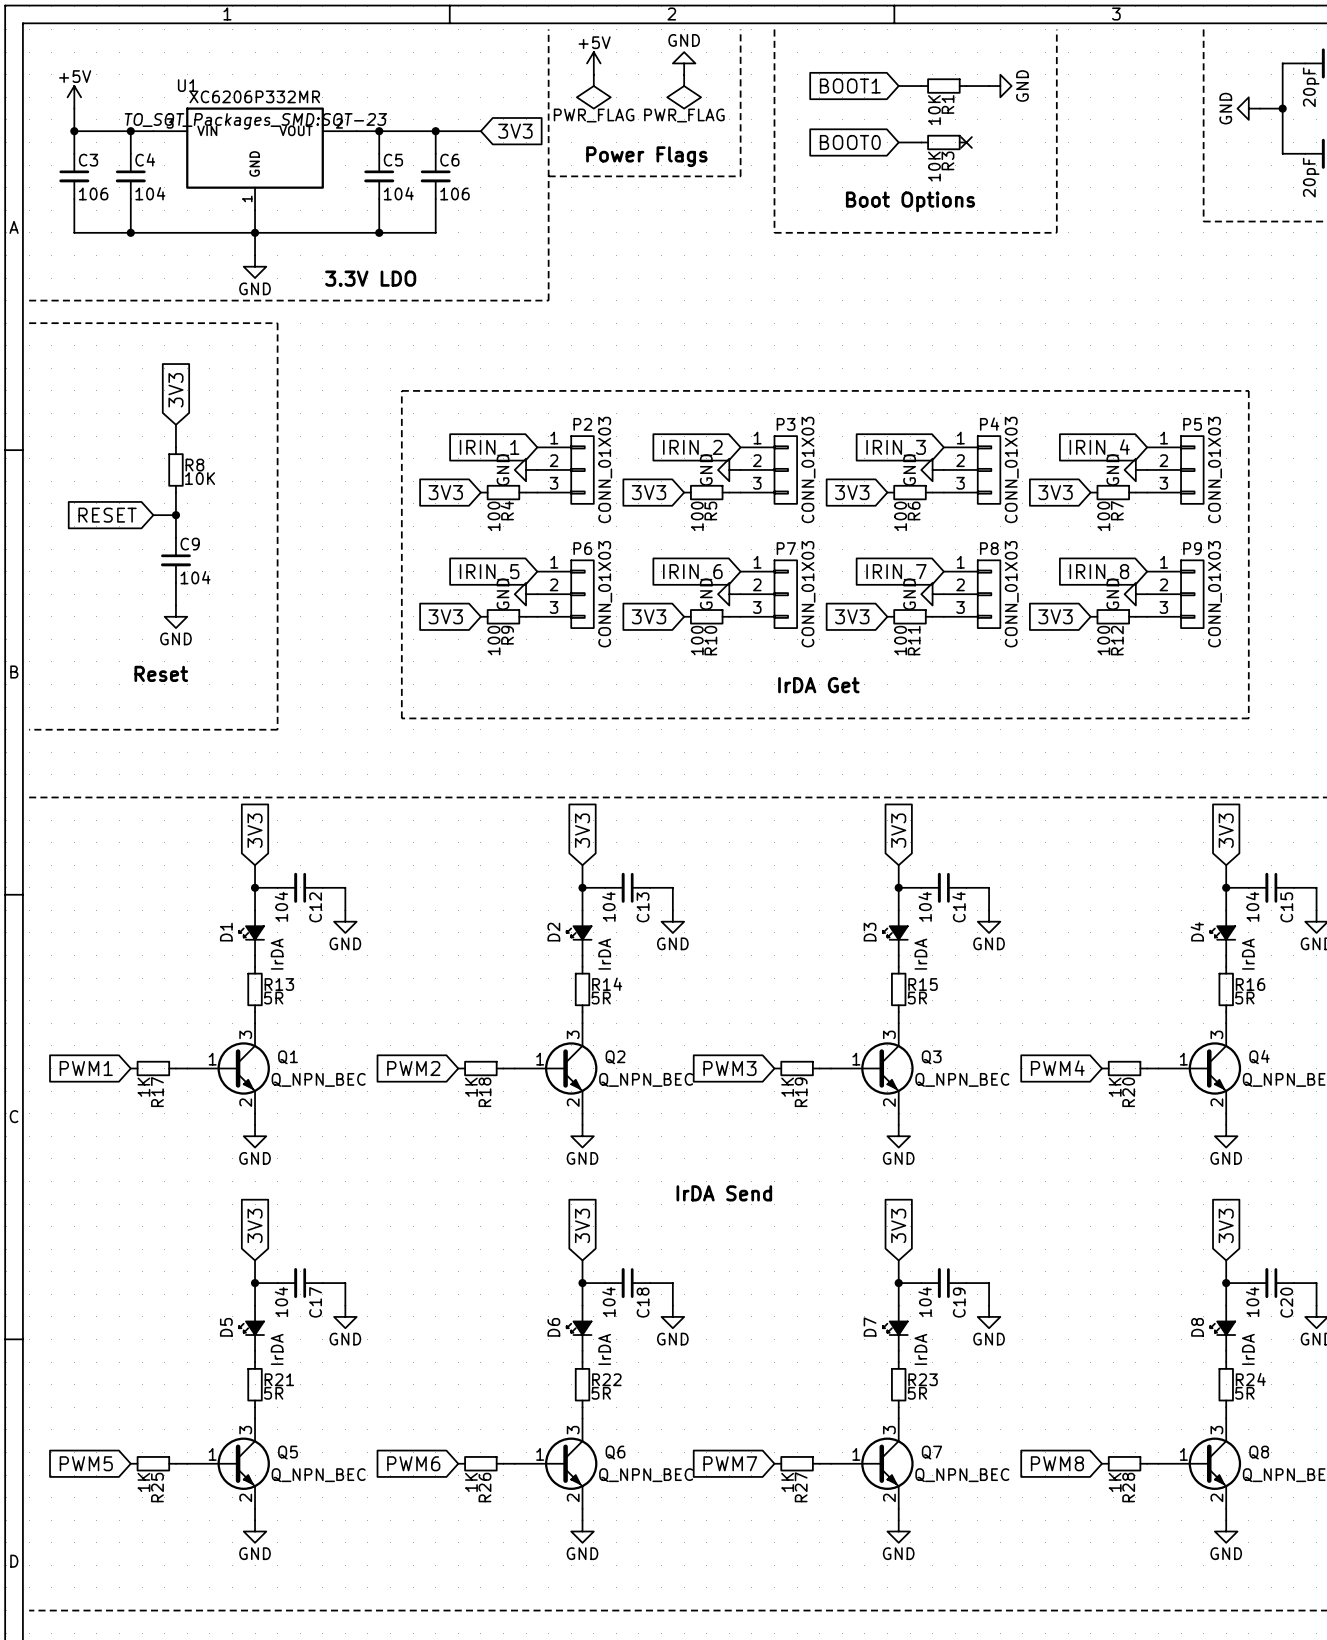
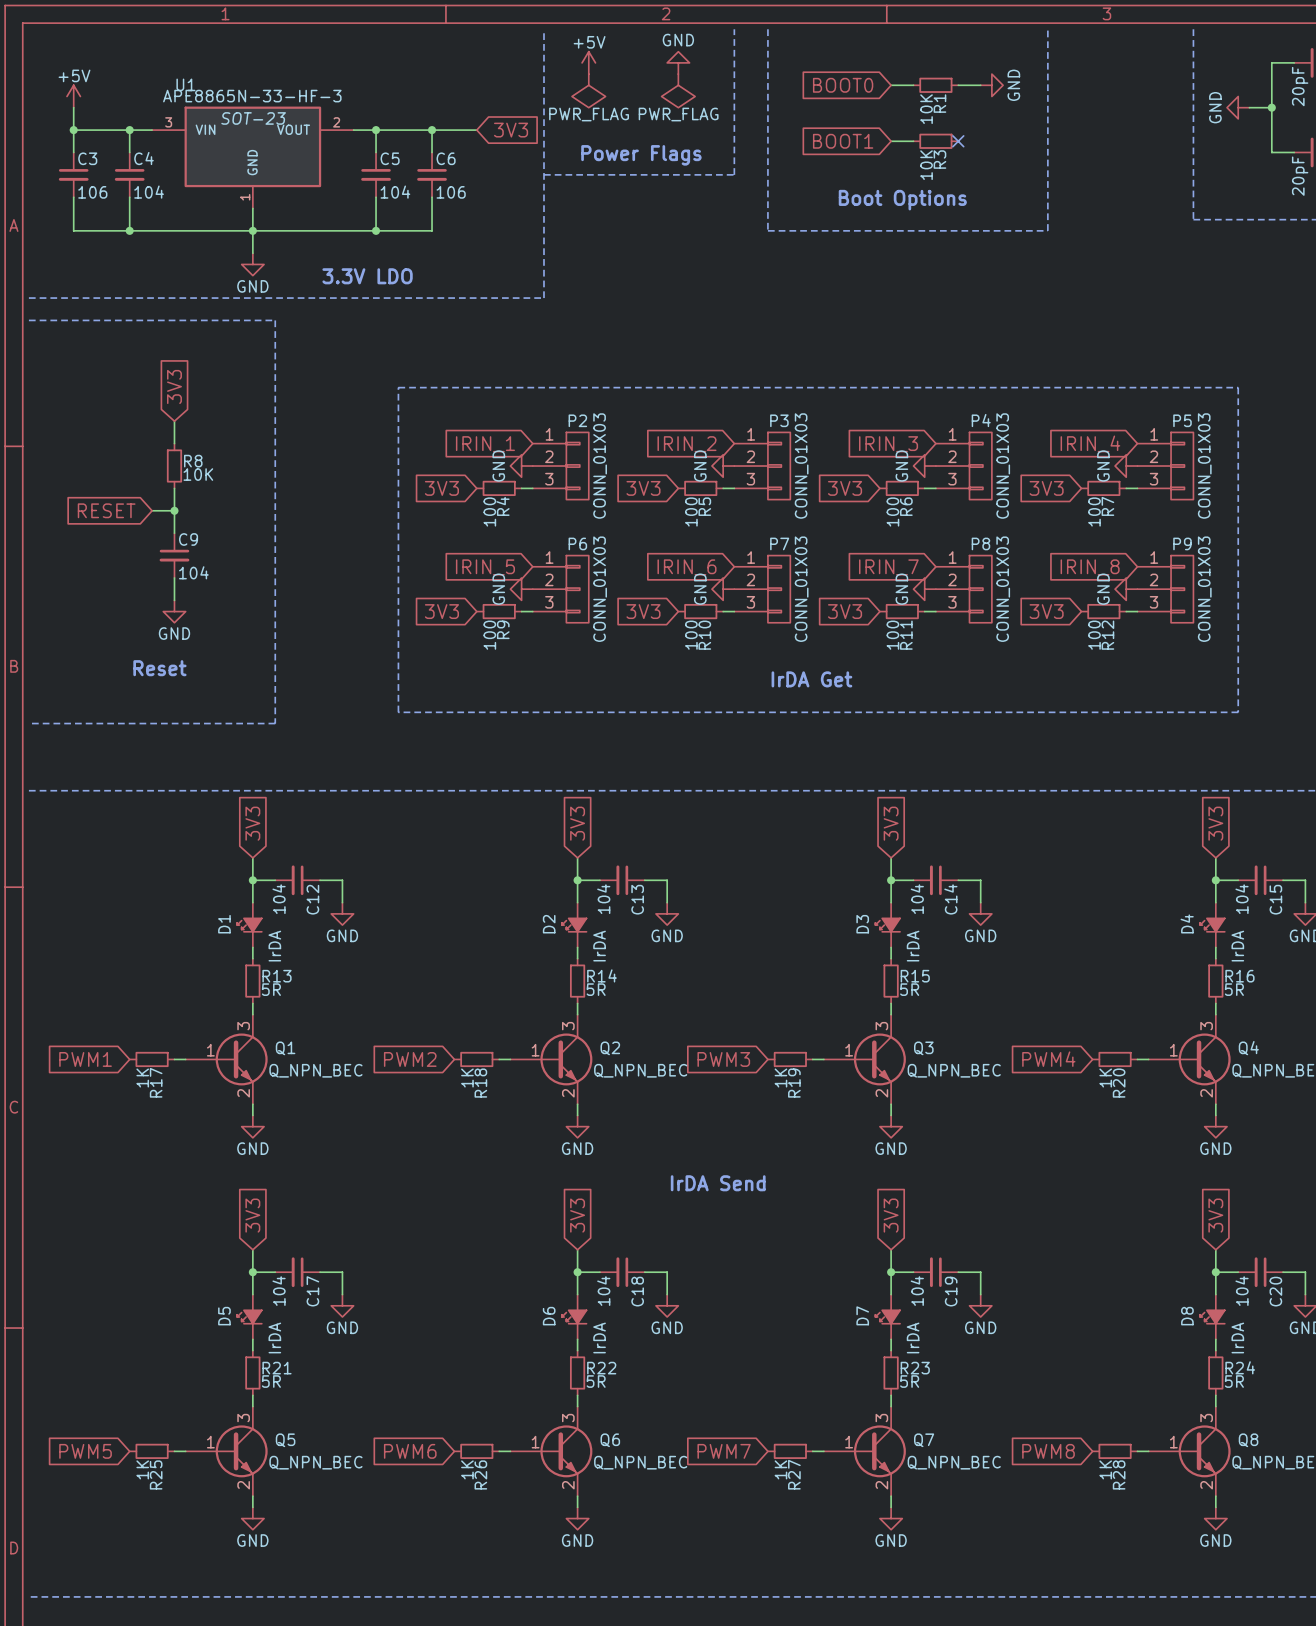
global label: BOOT1 (850, 86) -> BOOT0 (843, 85)
U1 value: XC6206P332MR (254, 96) -> APE8865N-33-HF-3 (252, 96)
U1 text: TO_SOT_Packages_SMD:SOT-23 (255, 121) -> SOT-23 (253, 118)
global label: BOOT0 (850, 142) -> BOOT1 (843, 141)

